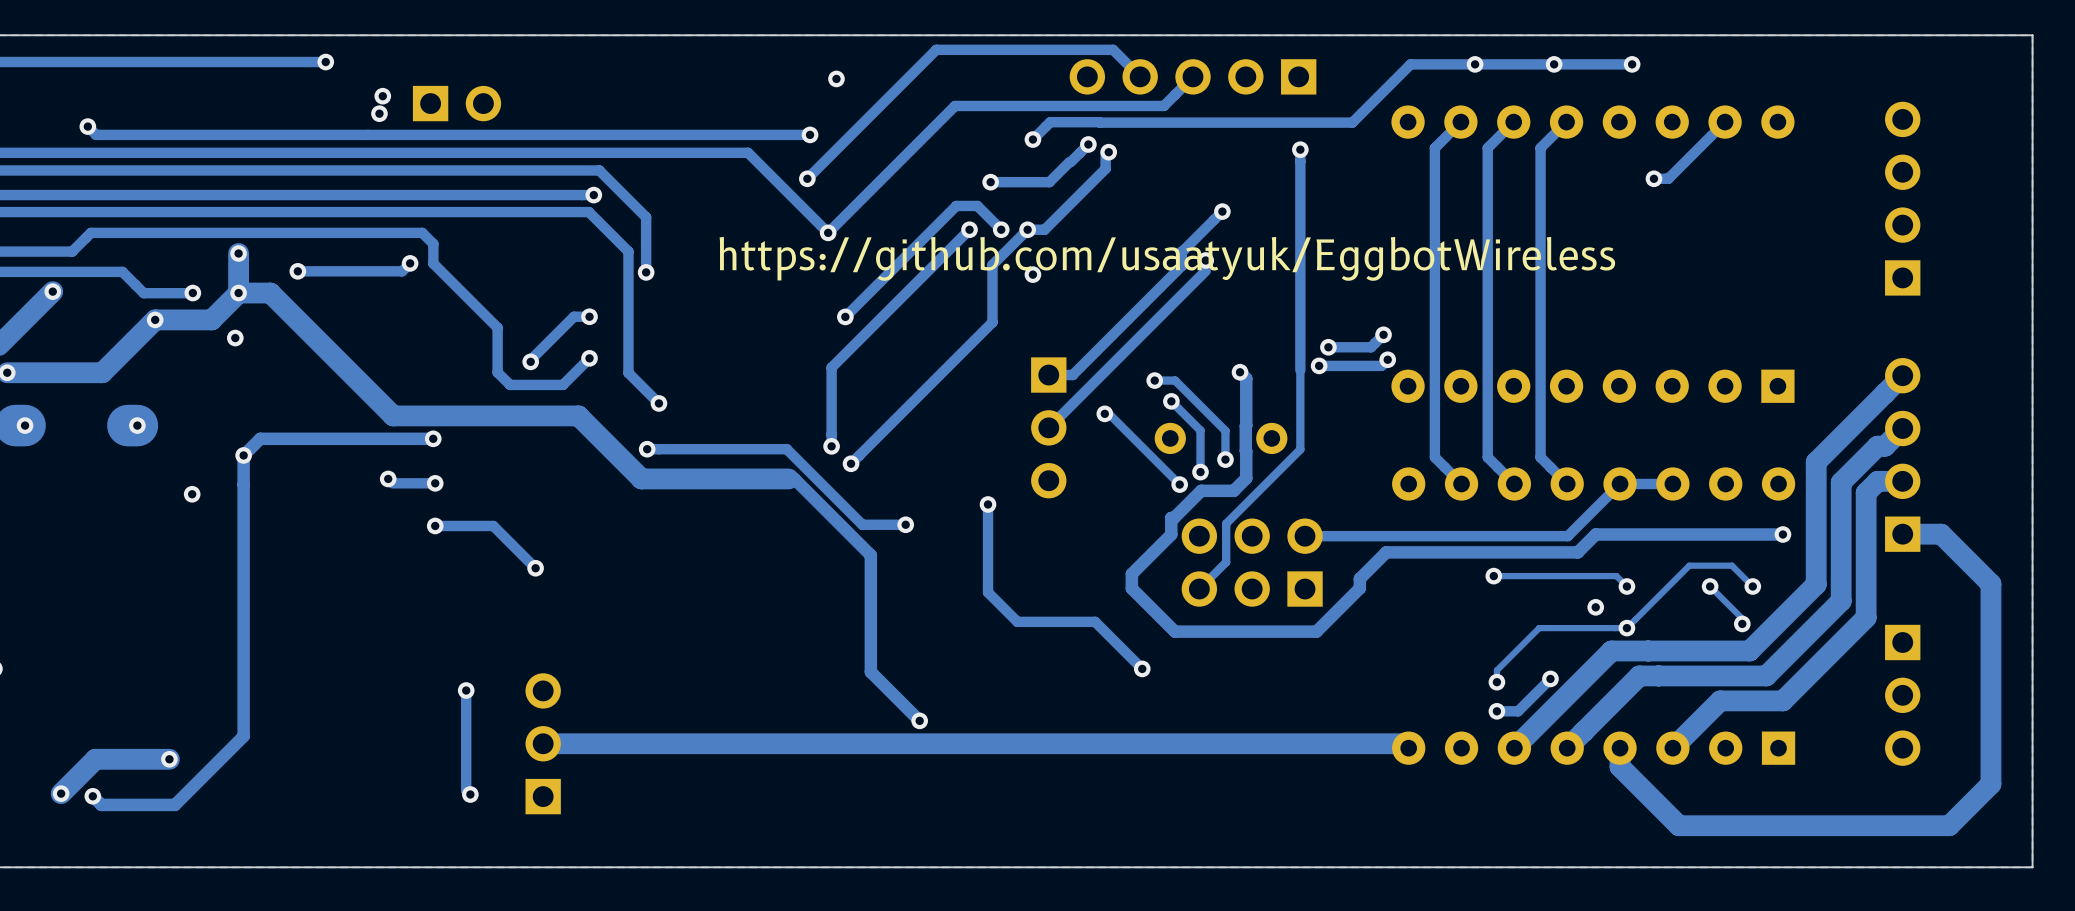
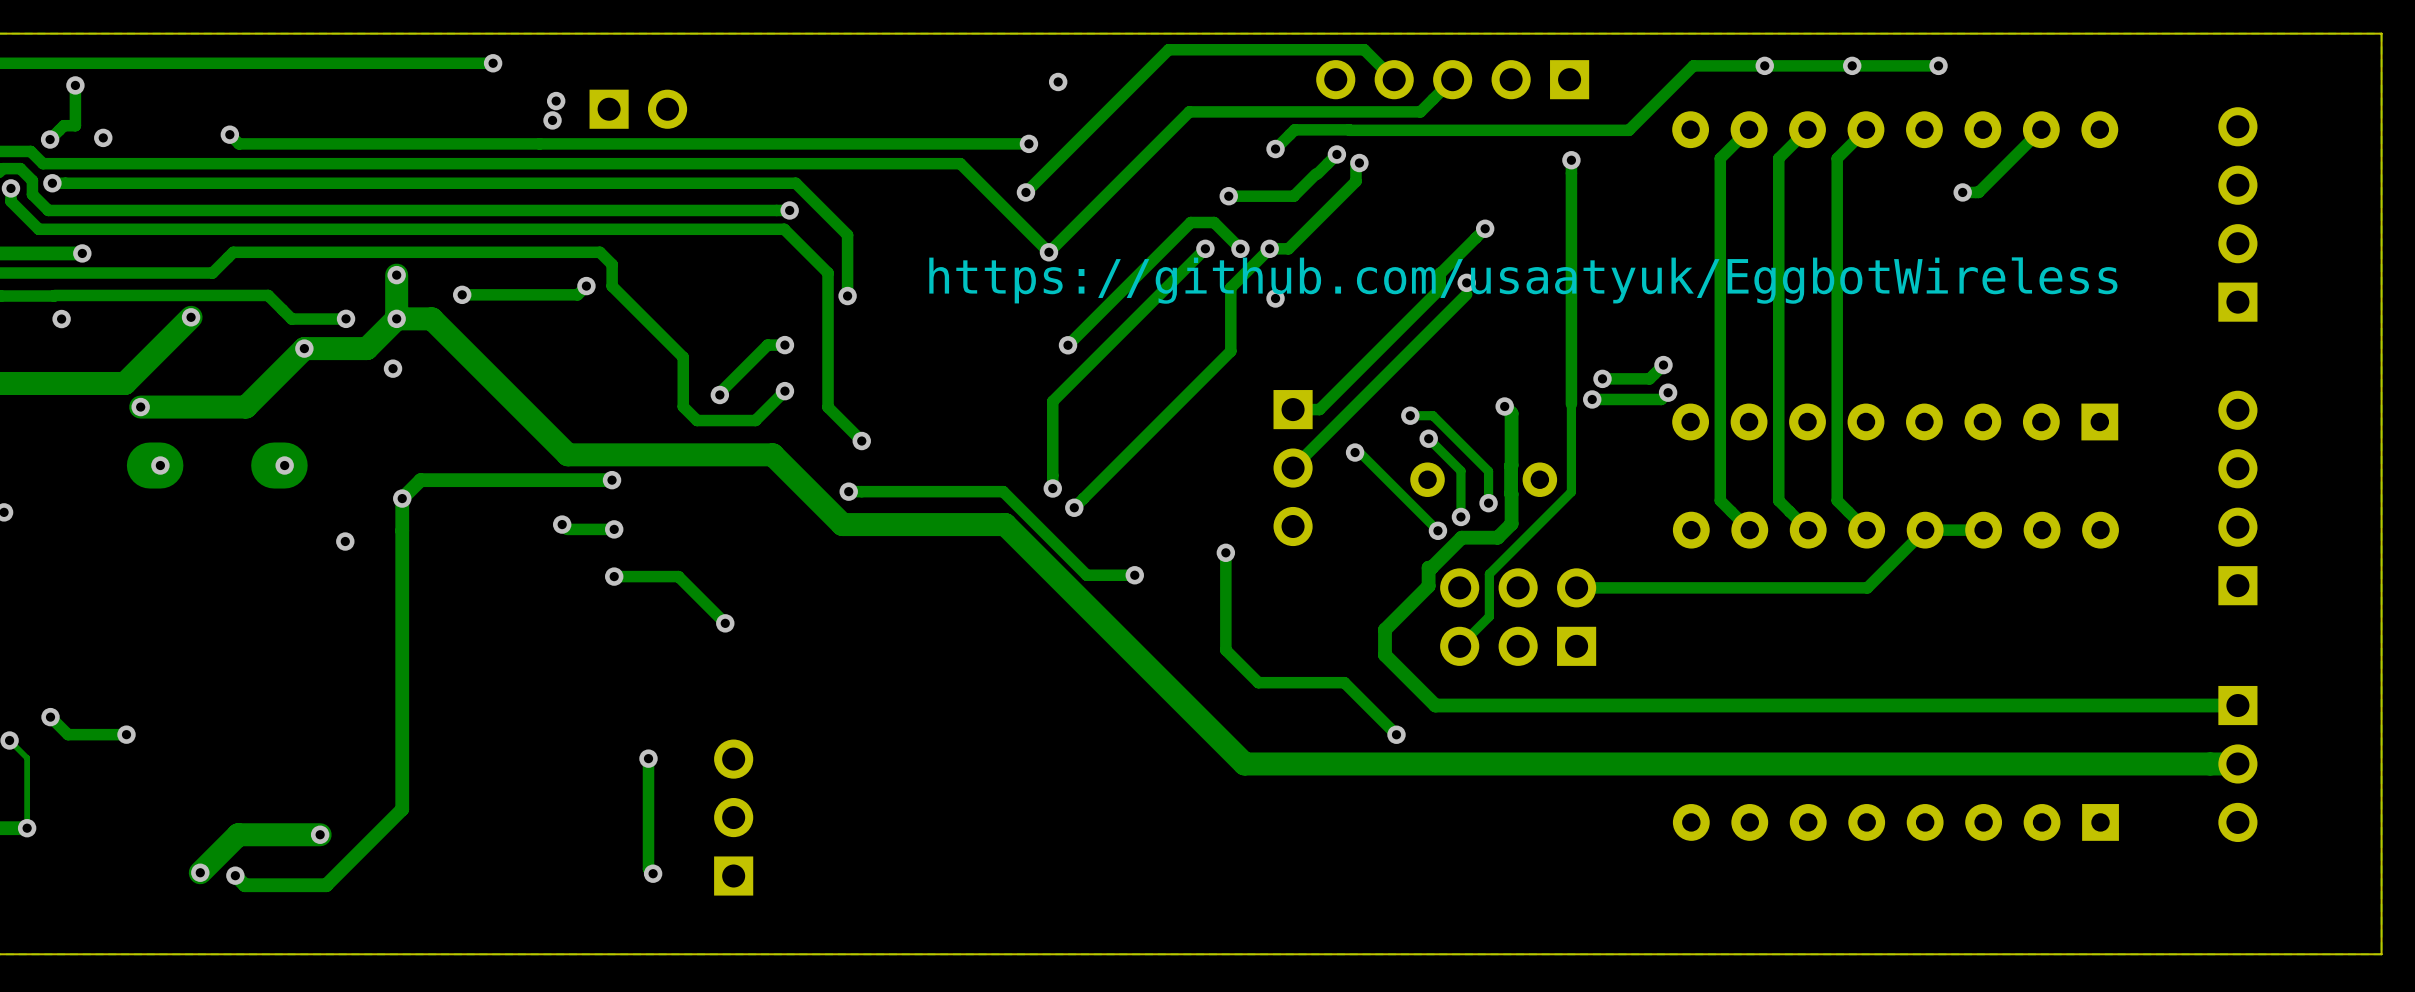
track: (1902, 375) (1816, 462) (1816, 584) (1749, 650) (1611, 650) (1514, 748) -> none
track: (1902, 428) (1885, 446) (1877, 446) (1841, 482) (1841, 601) (1766, 675) (1639, 675) (1567, 748) -> none
track: (788, 478) (794, 478) (870, 555) (870, 672) (919, 720) -> (1005, 524) (1244, 763) (2237, 763)
track: (1902, 481) (1877, 481) (1866, 492) (1866, 617) (1782, 700) (1720, 700) (1672, 748) -> none
track: (1782, 534) (1595, 534) (1577, 552) (1386, 552) (1359, 578) (1359, 588) (1316, 631) (1174, 631) (1131, 588) -> (2237, 705) (1435, 705) (1385, 655) (1385, 645)
via: (1782, 534) -> none
track: (1902, 534) (1941, 534) (1990, 583) (1990, 784) (1949, 825) (1678, 825) (1620, 766) (1620, 748) -> none
track: (1493, 576) (1616, 576) (1626, 586) -> none
via: (1493, 576) -> none
via: (1626, 586) -> none
track: (1710, 586) (1742, 618) (1742, 623) -> none
via: (1710, 586) -> none
track: (1752, 586) (1731, 565) (1689, 565) (1626, 628) (1539, 628) (1496, 670) (1496, 682) -> none
via: (1752, 586) -> none
via: (1595, 607) -> none
via: (1742, 623) -> none
via: (1626, 628) -> none
track: (1550, 678) (1518, 711) (1496, 711) -> none
via: (1550, 678) -> none
via: (1496, 682) -> none
via: (1496, 711) -> none
via: (919, 720) -> none
track: (543, 743) (1404, 743) (1408, 748) -> none

